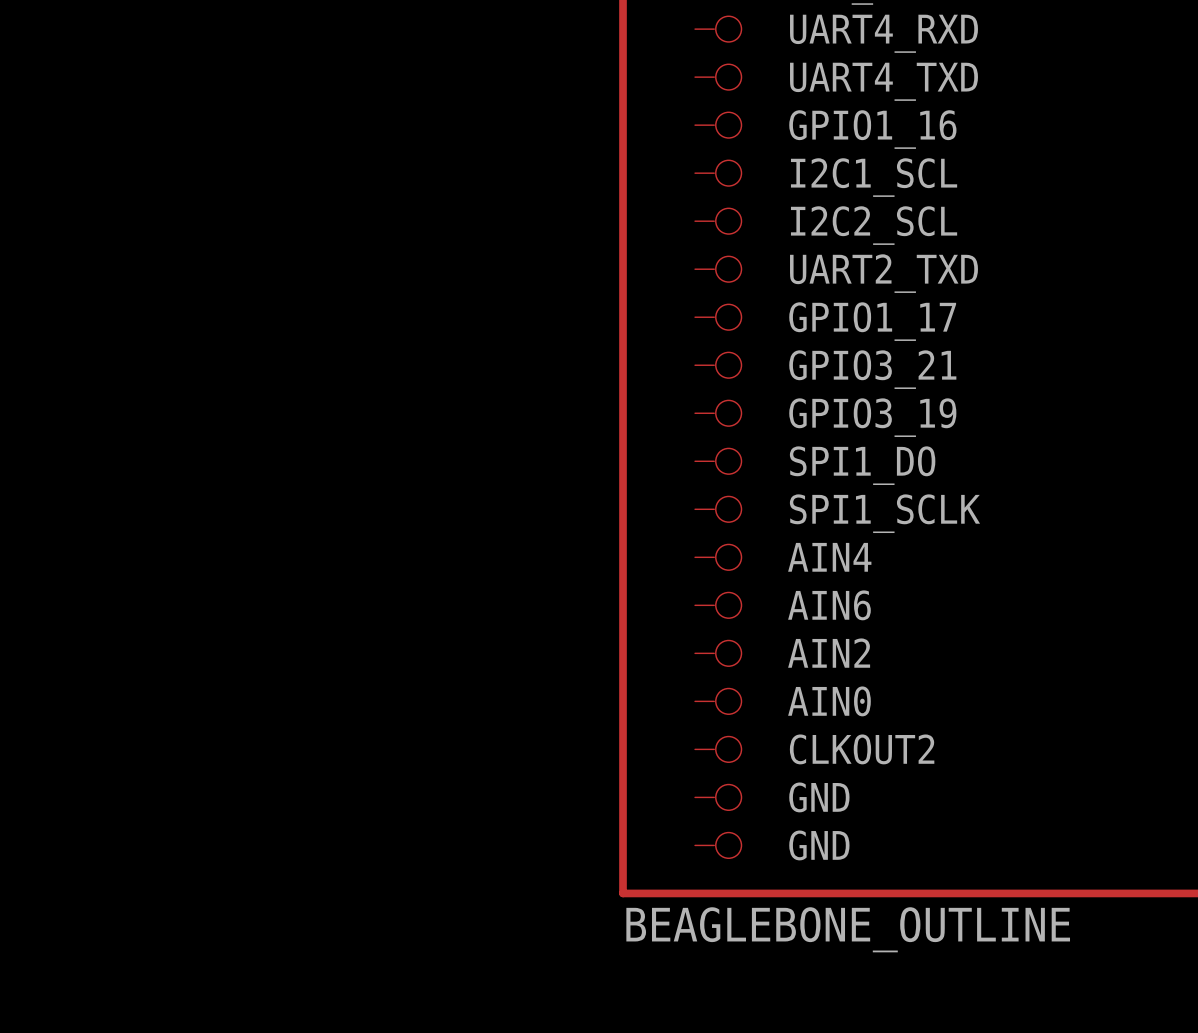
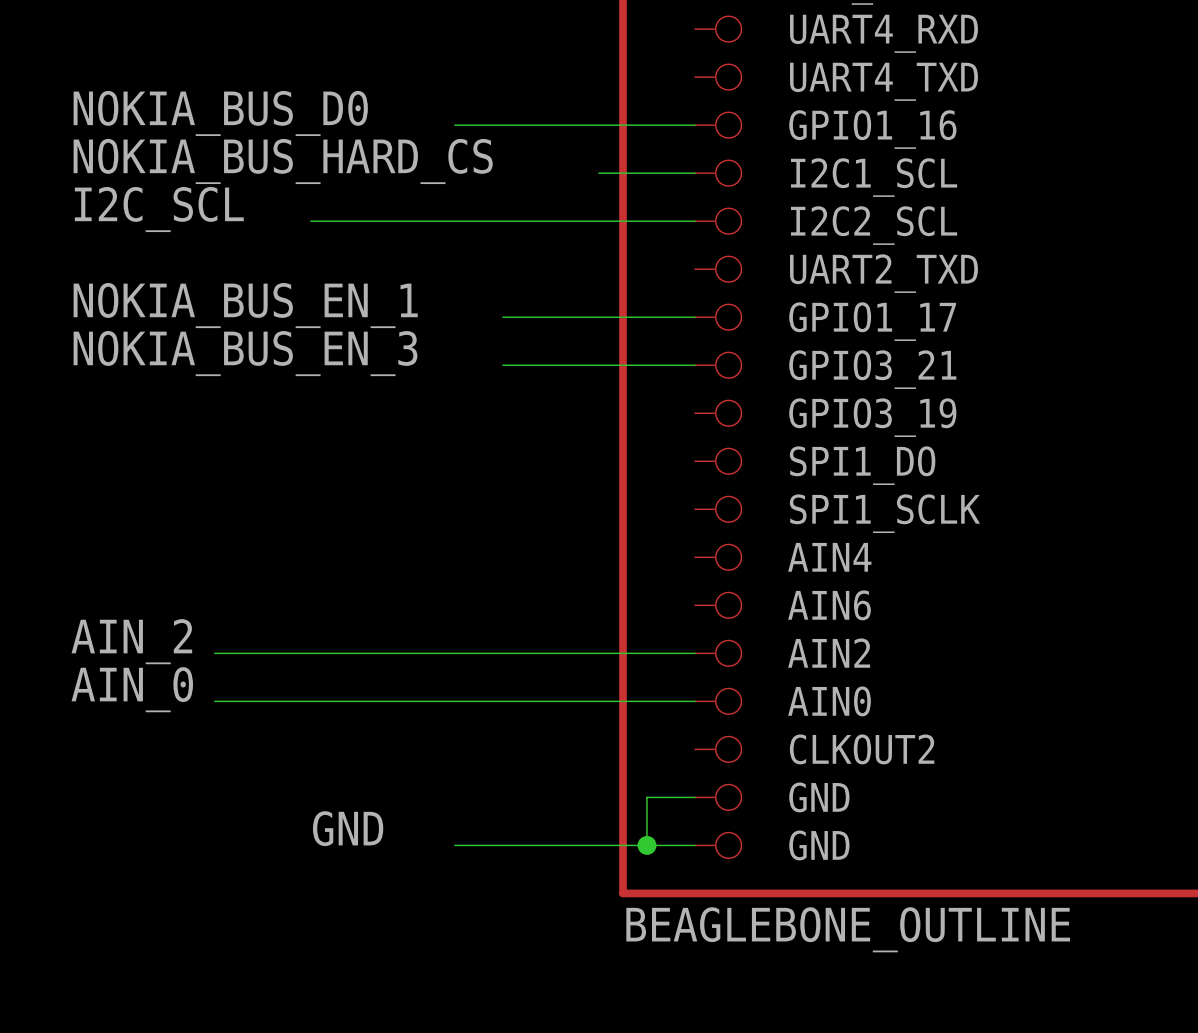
label: none -> NOKIA_BUS_D0 (220, 113)
wire: none -> (454, 125) (695, 125)
label: none -> NOKIA_BUS_HARD_CS (283, 161)
wire: none -> (598, 173) (695, 173)
label: none -> I2C_SCL (159, 209)
wire: none -> (310, 221) (695, 221)
label: none -> NOKIA_BUS_EN_1 (245, 305)
wire: none -> (502, 317) (695, 317)
label: none -> NOKIA_BUS_EN_3 (245, 353)
wire: none -> (502, 365) (695, 365)
label: none -> AIN_2 (131, 641)
wire: none -> (214, 653) (695, 653)
label: none -> AIN_0 (132, 689)
wire: none -> (214, 701) (695, 701)
wire: none -> (695, 797) (647, 797) (647, 845)
label: none -> GND (348, 828)
wire: none -> (454, 845) (695, 845)
junction: none -> (647, 845)

